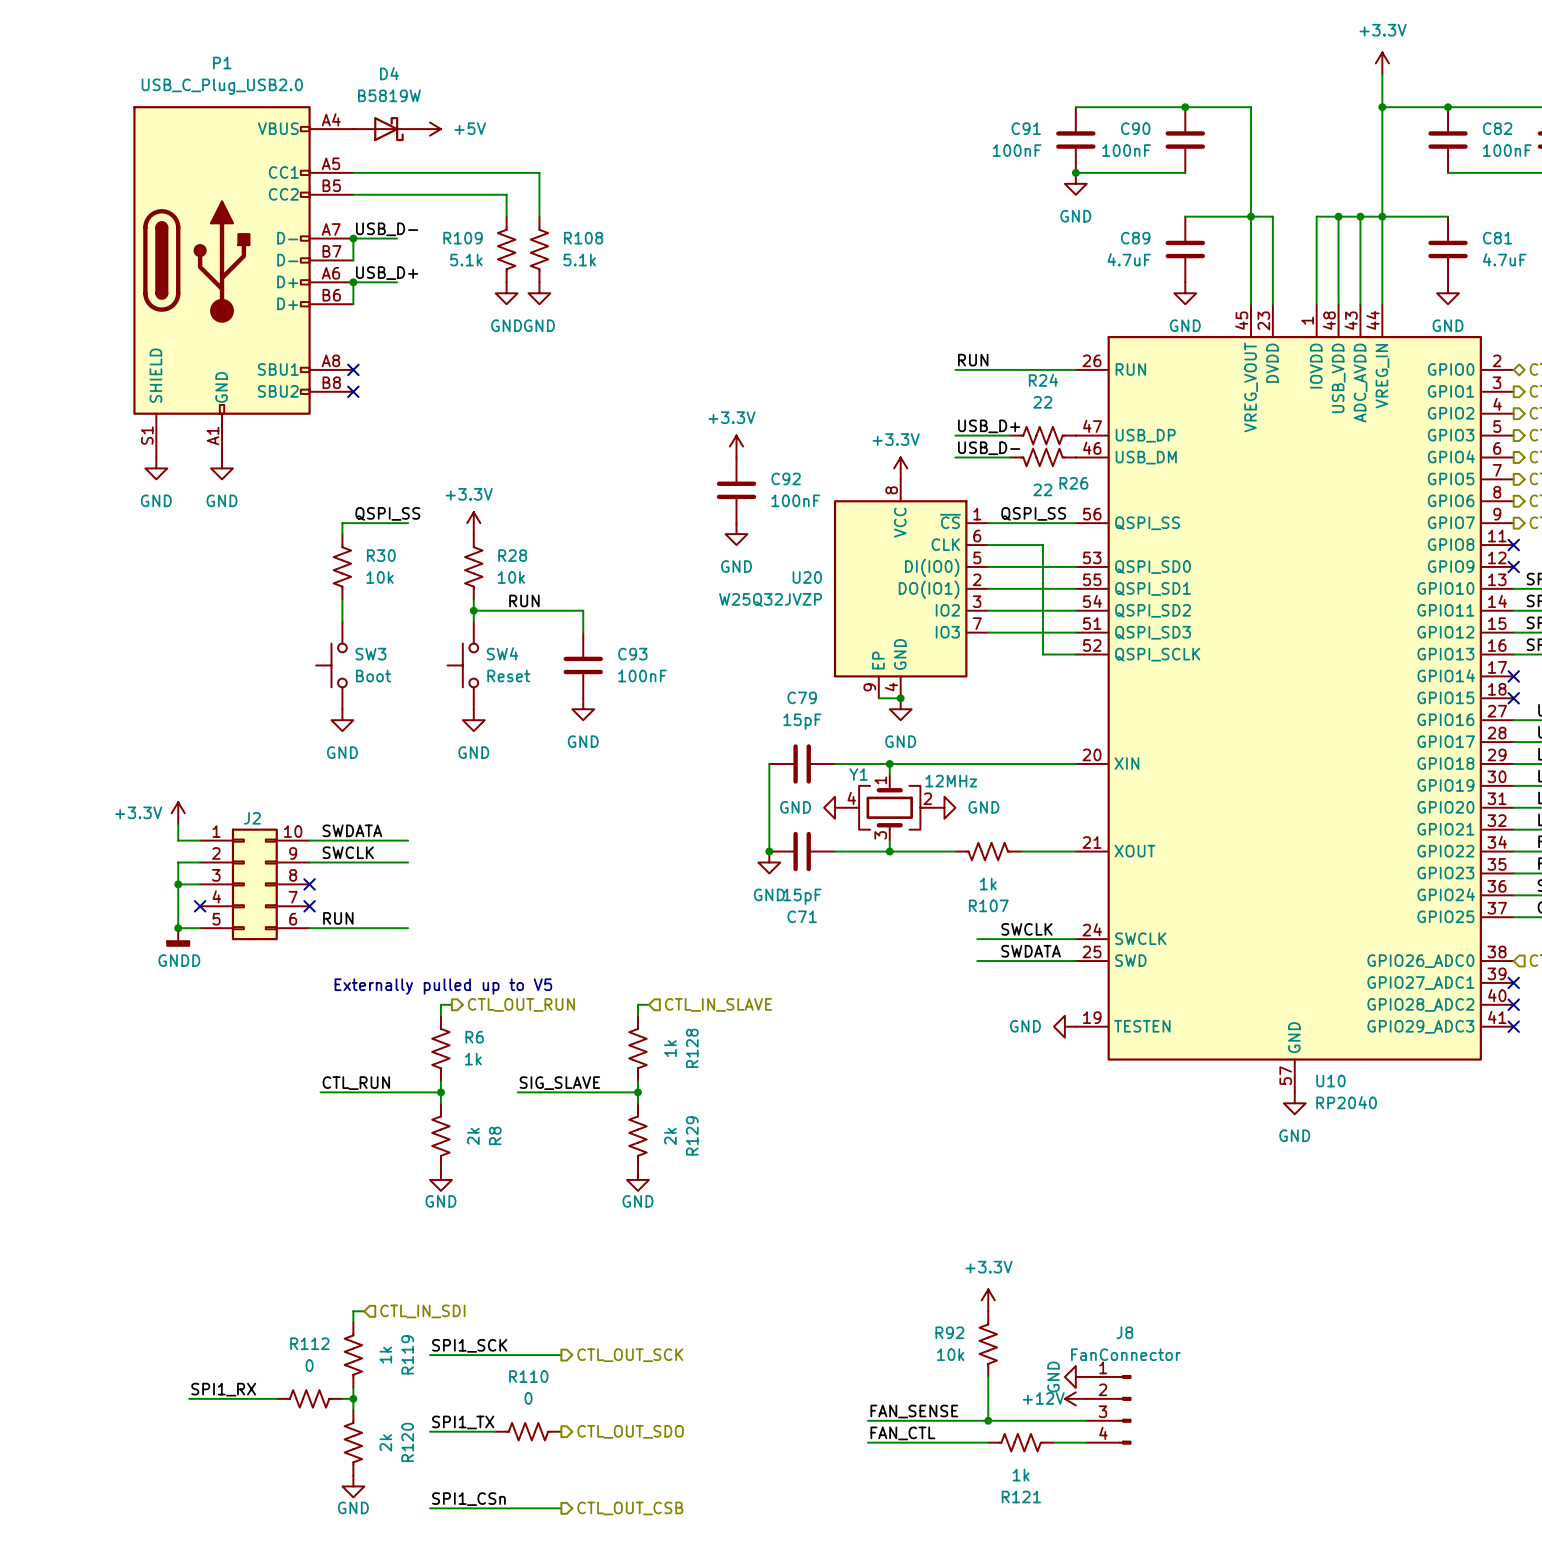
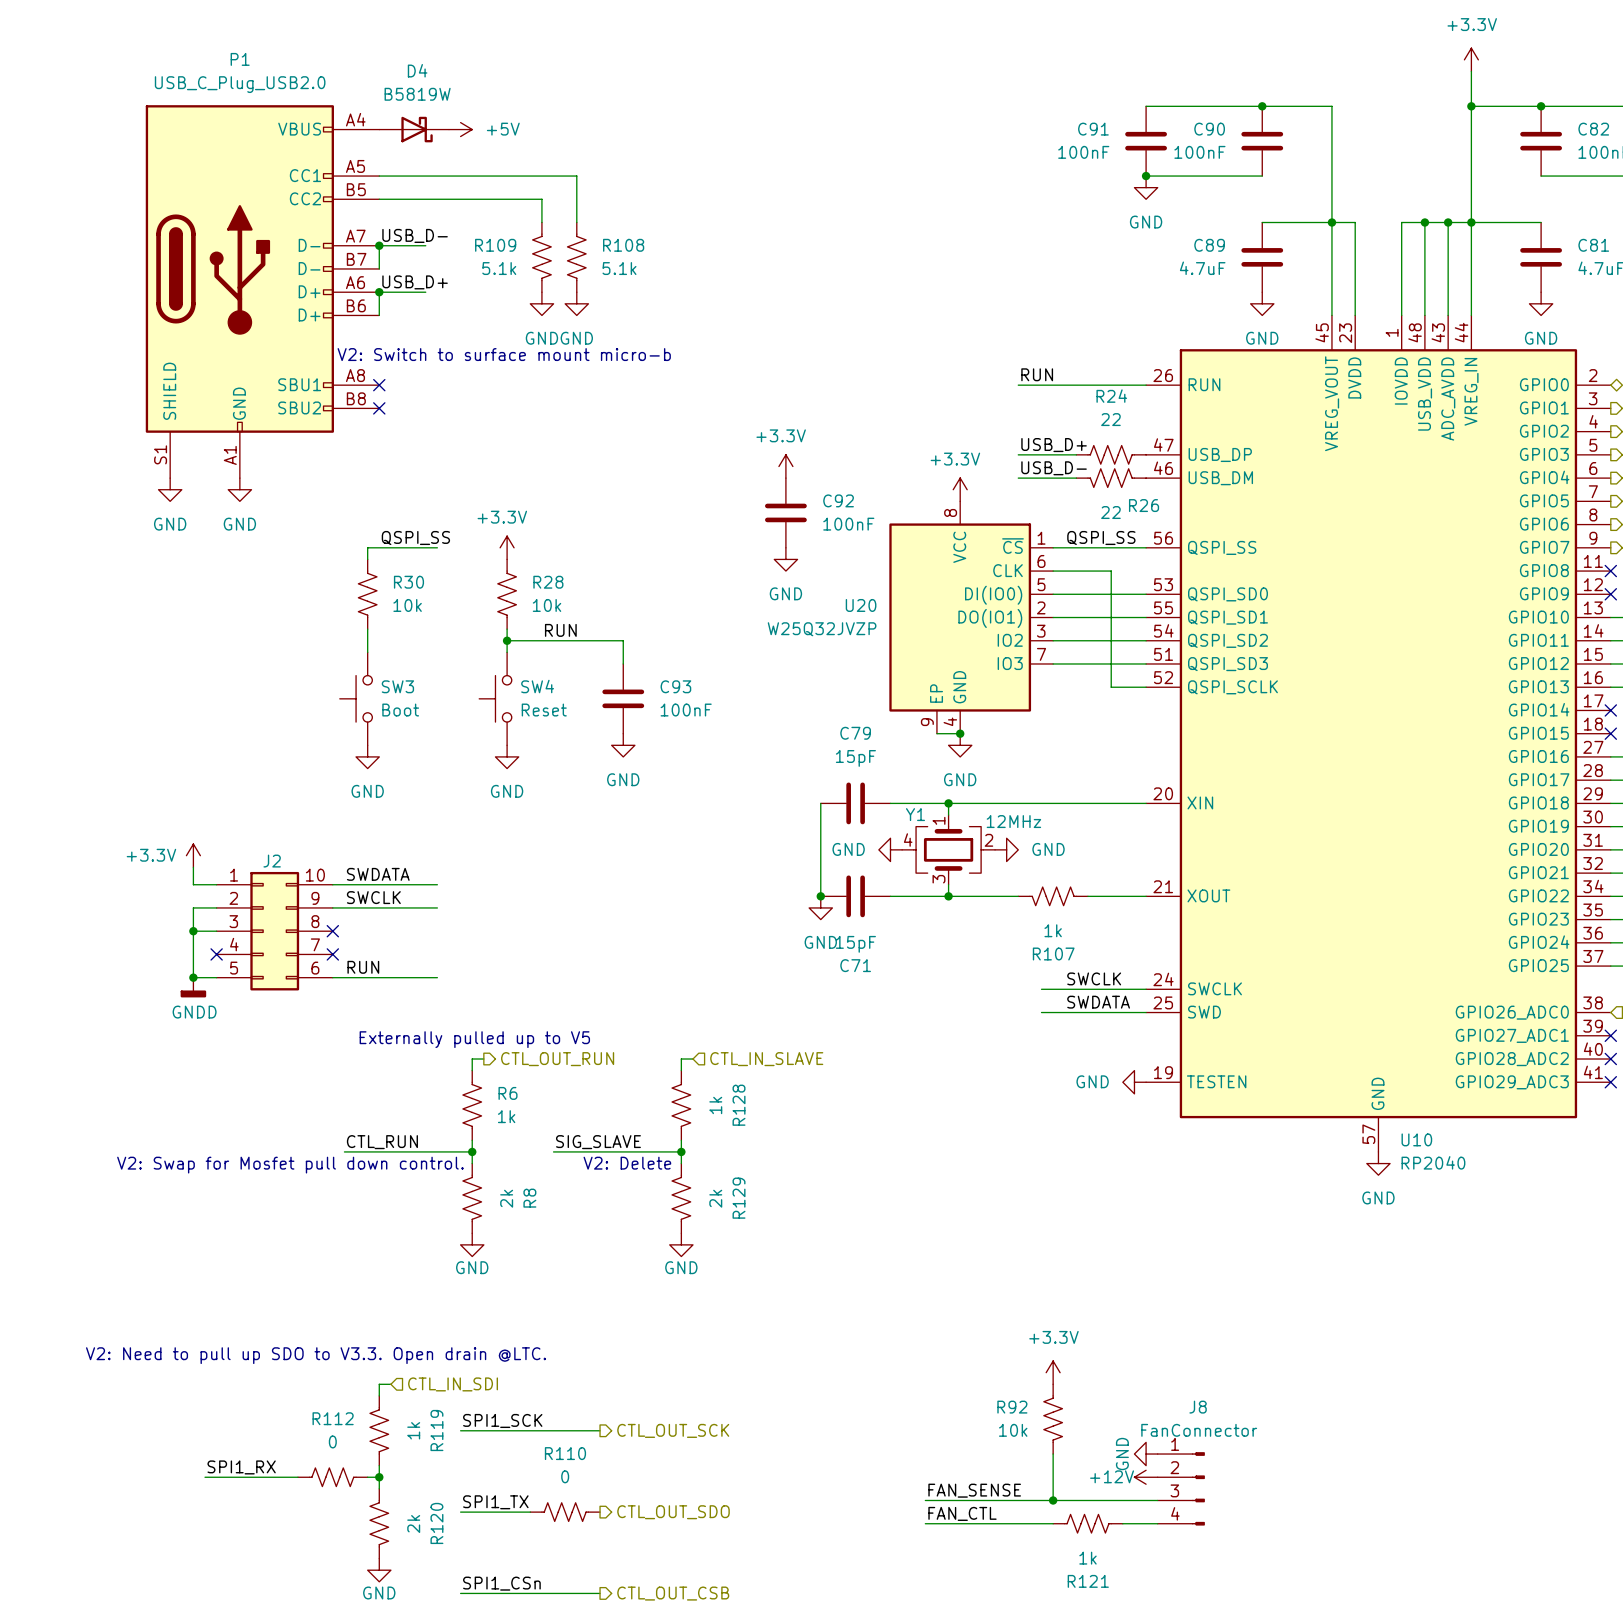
text: none -> V2: Switch to surface mount micro-b (504, 354)
text: none -> V2: Delete (627, 1163)
text: none -> V2: Swap for Mosfet pull down control. (290, 1165)
text: none -> V2: Need to pull up SDO to V3.3. Open drain @LTC. (316, 1355)

